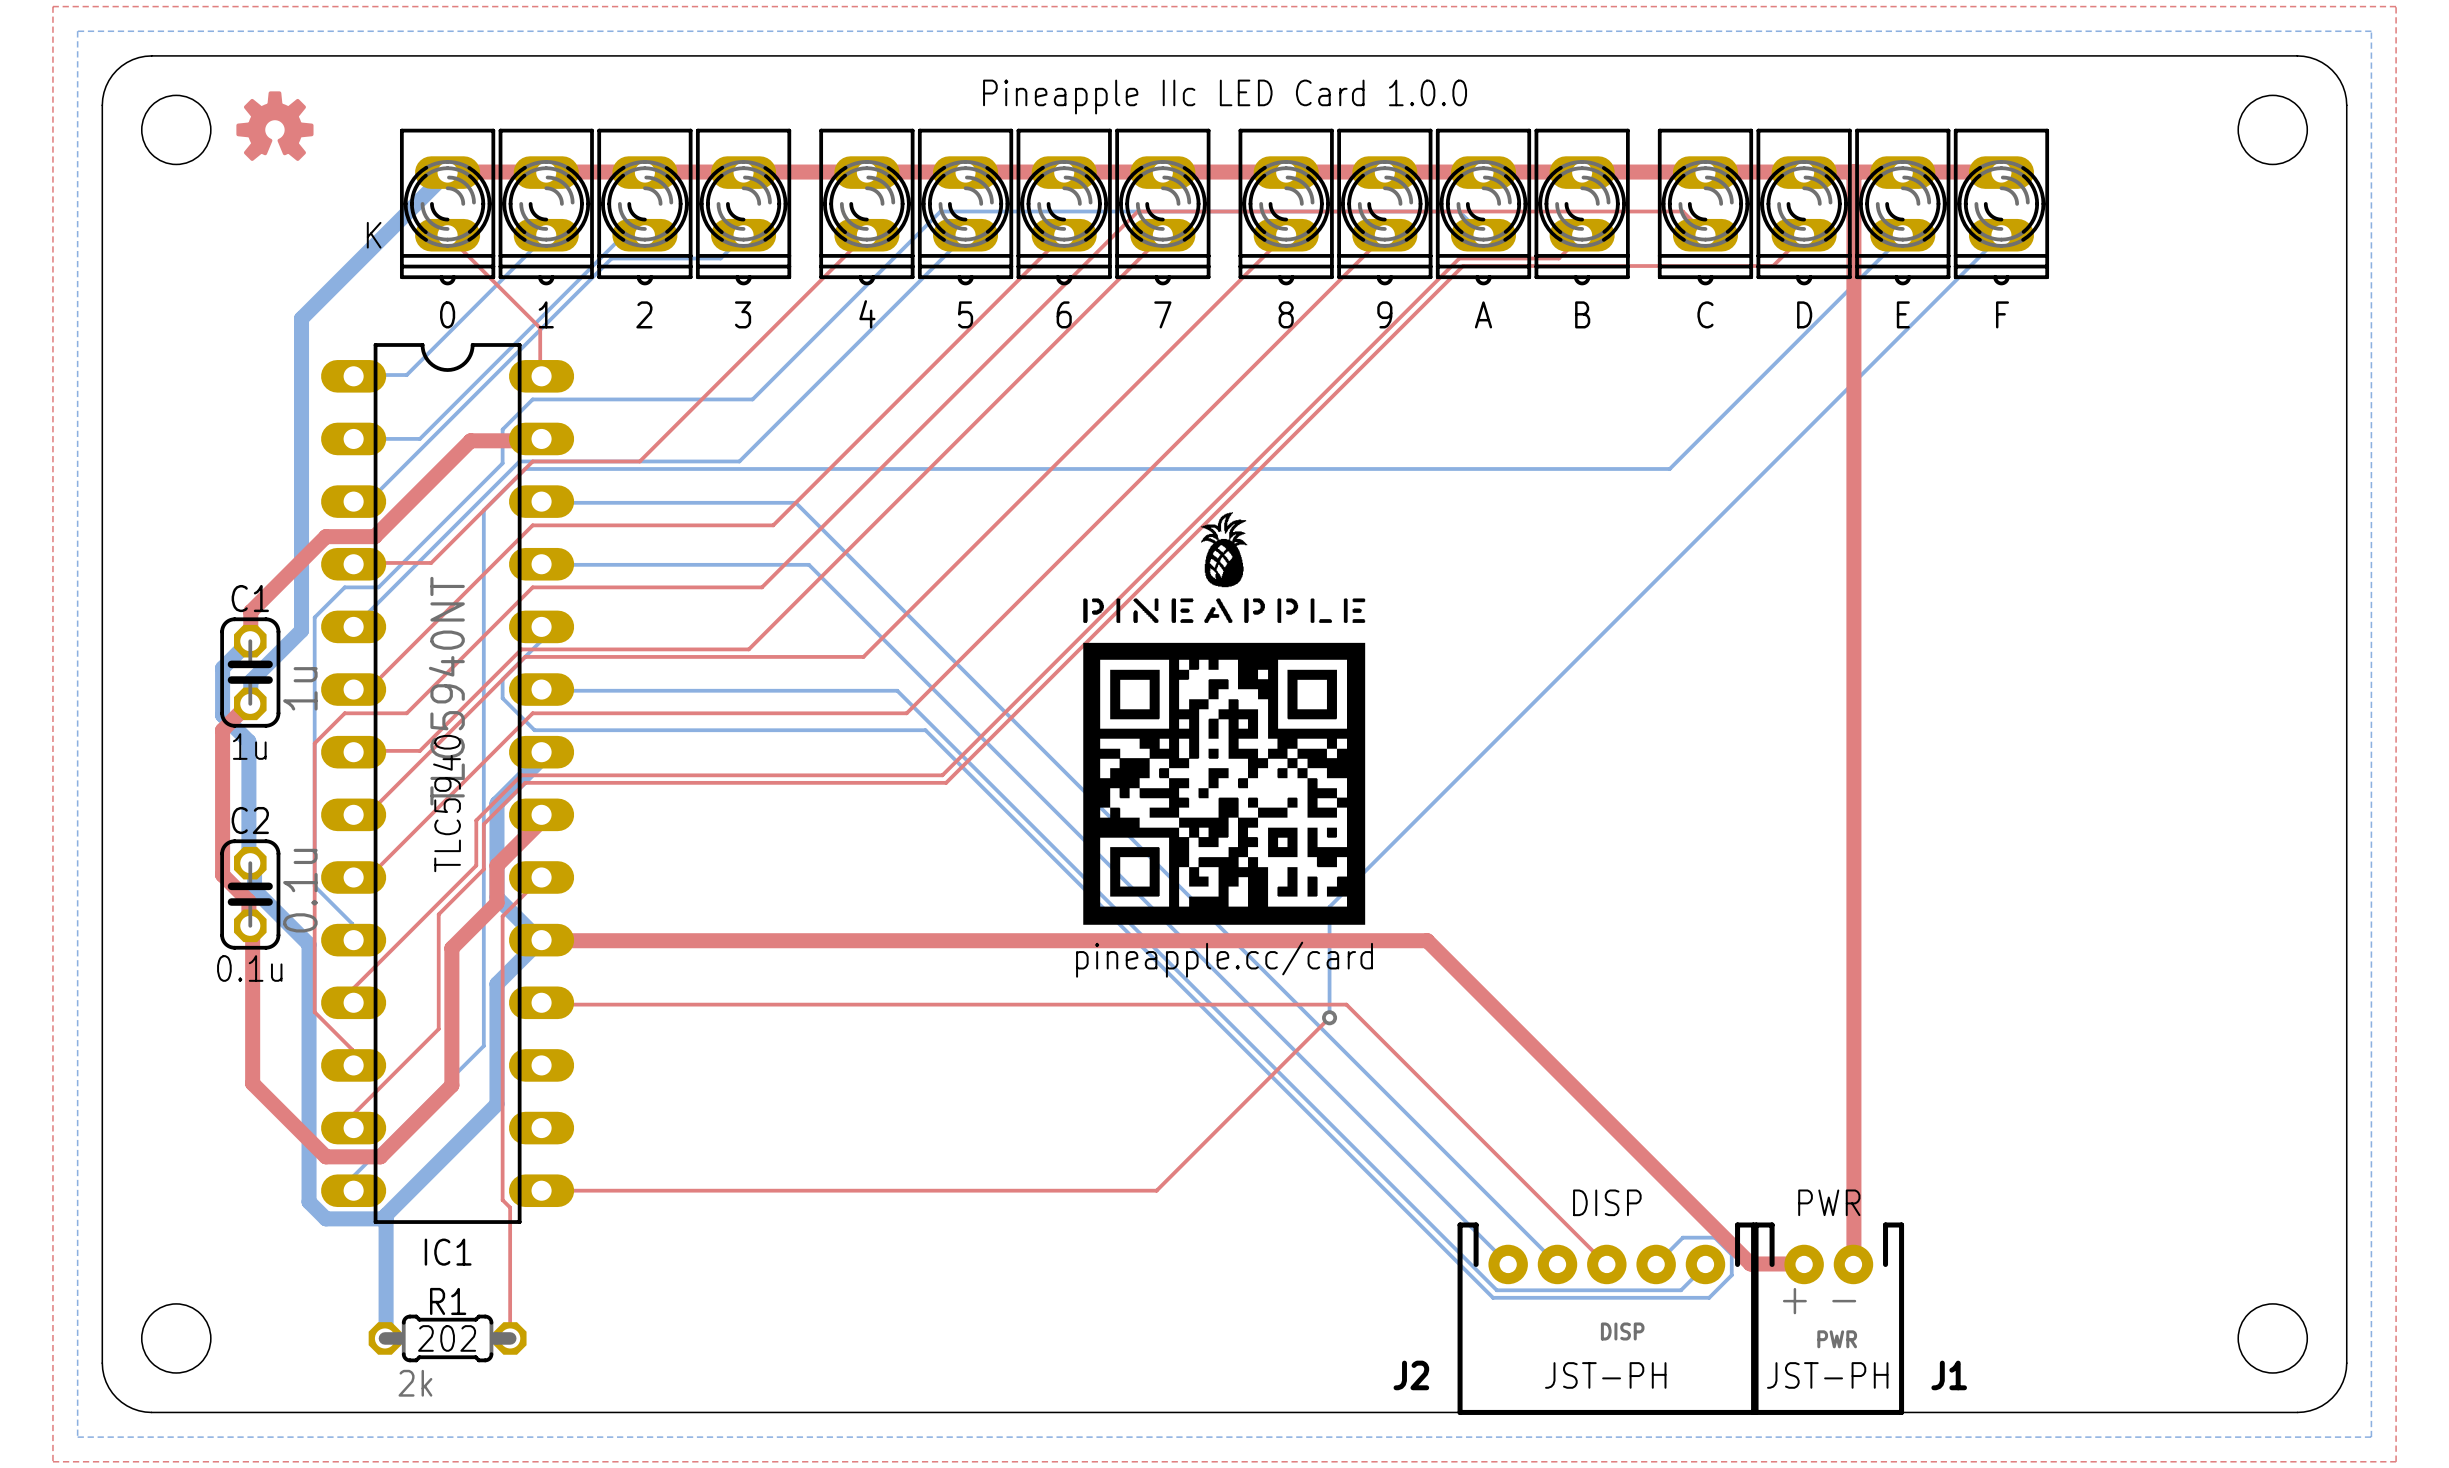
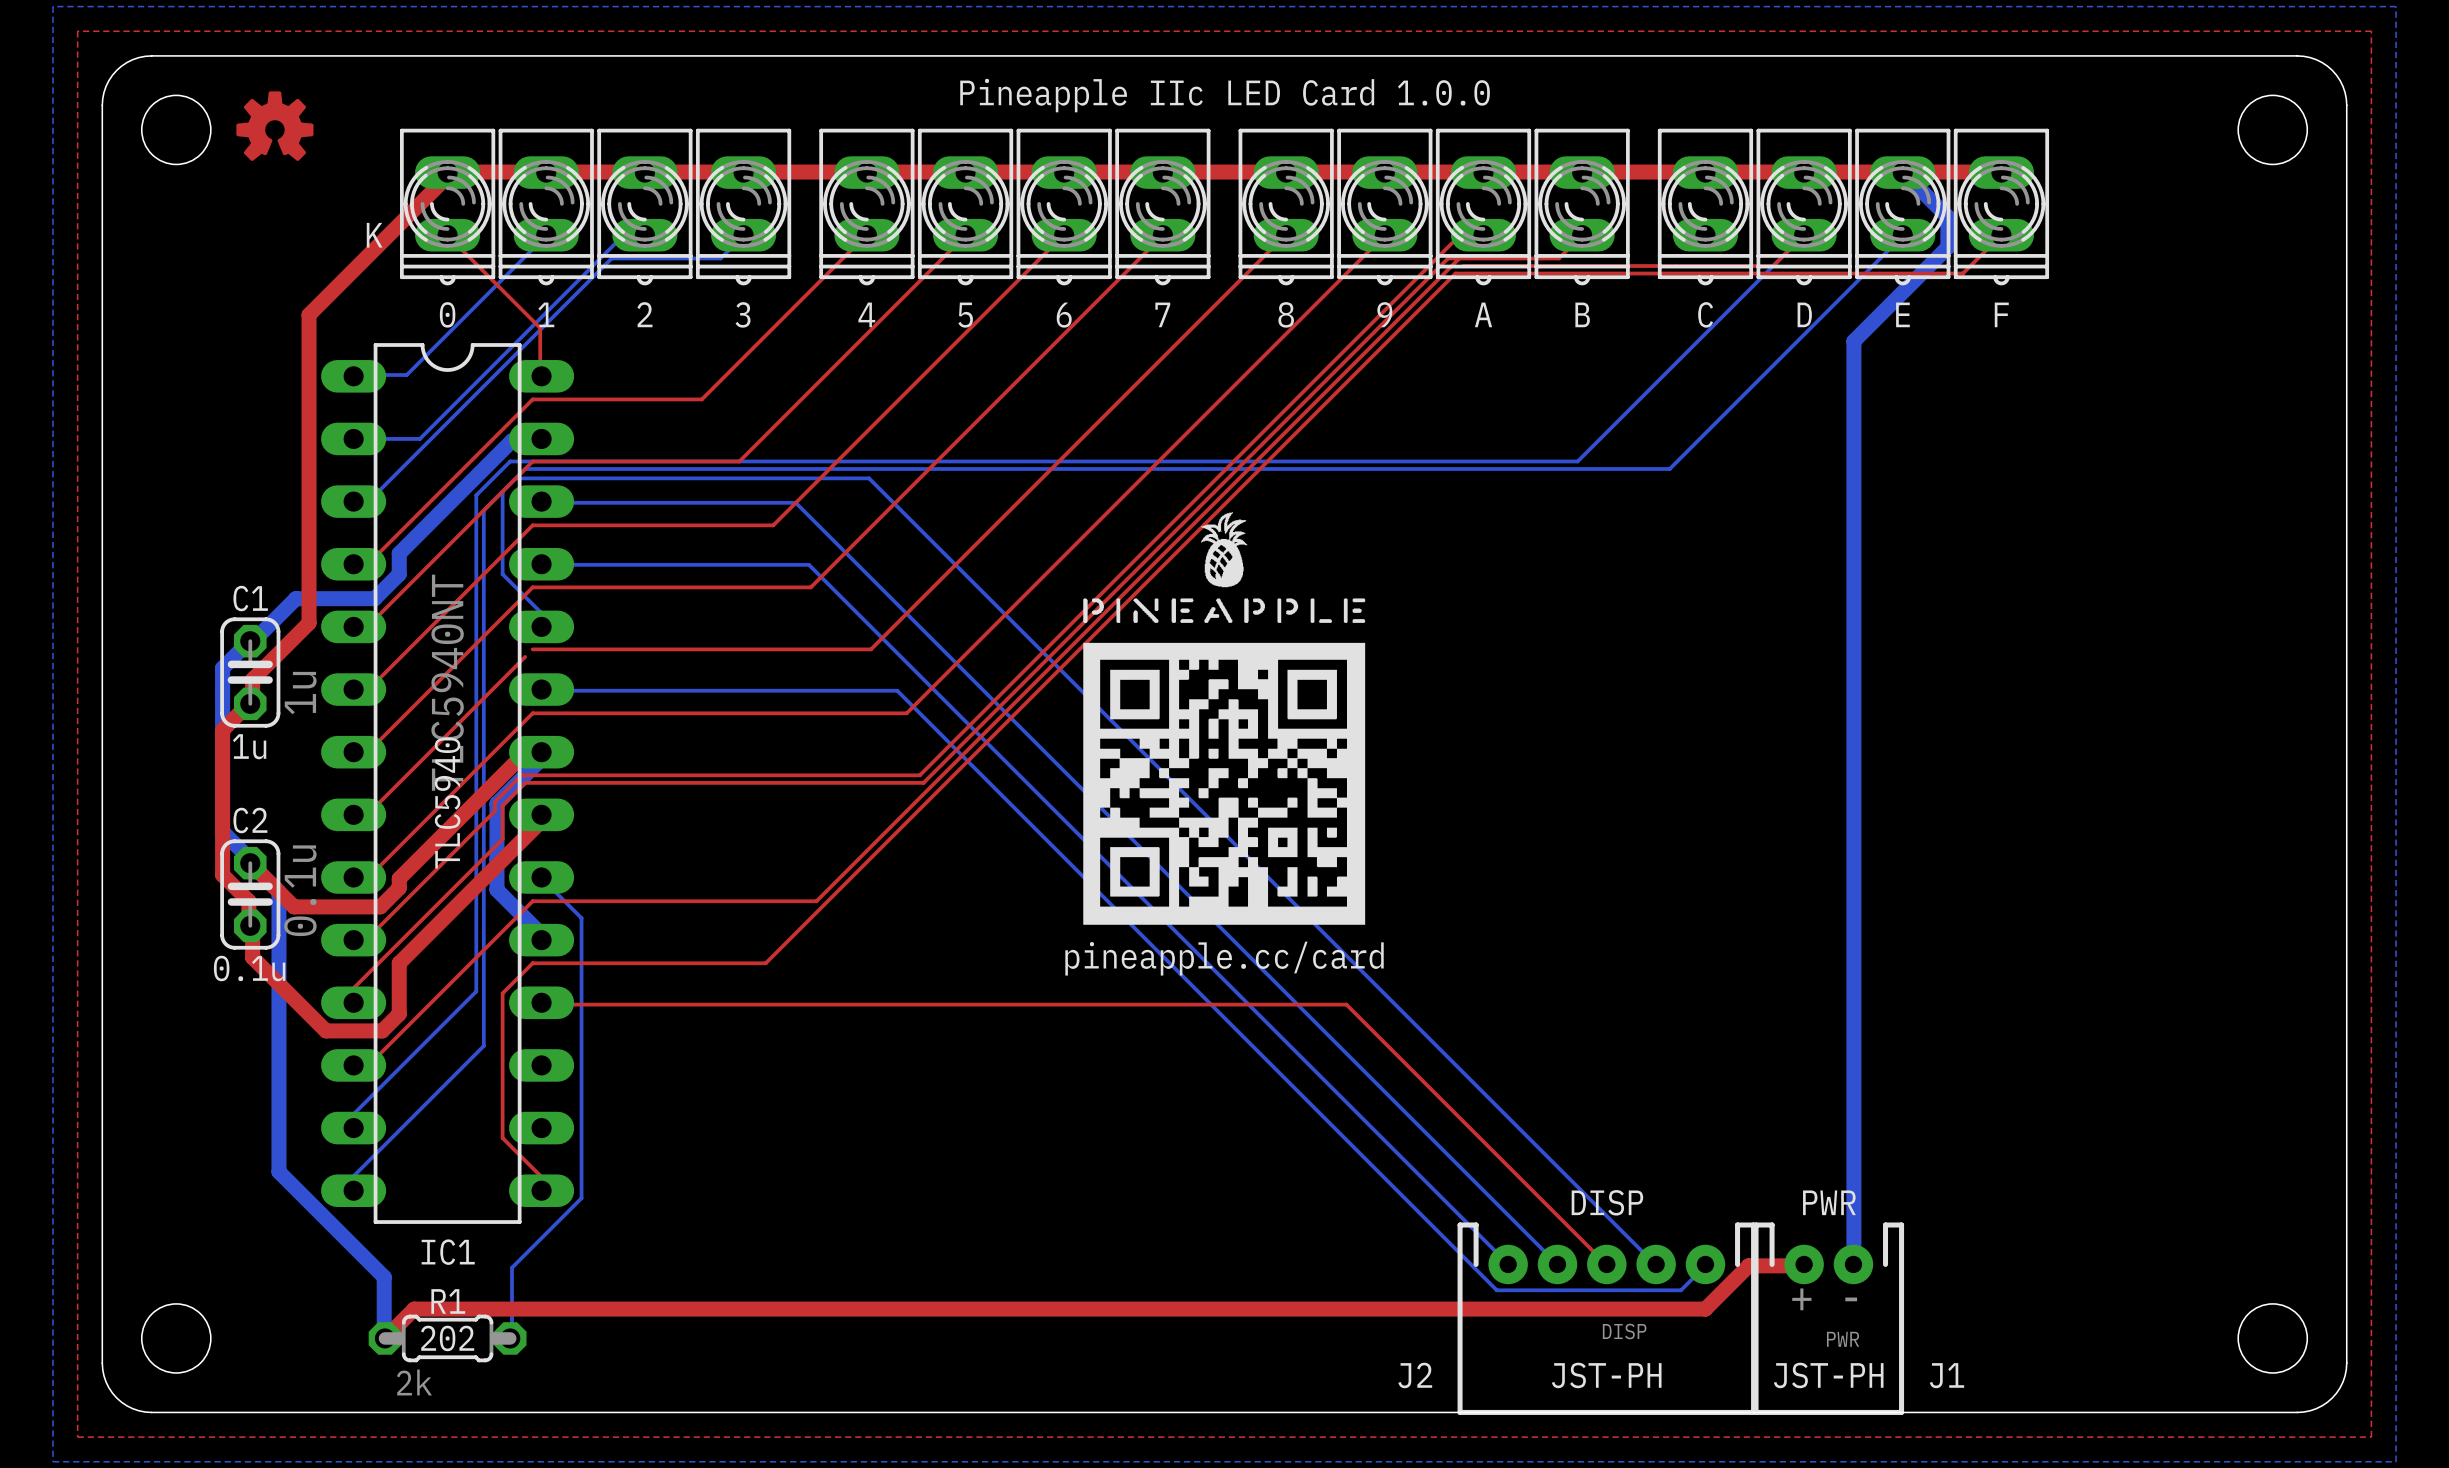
top zone outline: (52, 6) (2396, 6) (2396, 1461) (52, 1461) (52, 6) -> (77, 31) (77, 1437) (2371, 1437) (2371, 31) (77, 31)
bottom zone outline: (77, 31) (2371, 31) (2371, 1437) (77, 1437) (77, 31) -> (52, 6) (52, 1461) (2396, 1461) (2396, 6) (52, 6)
bottom track: (447, 172) (301, 318) (301, 630) (250, 681) (250, 703) -> none
top track: none -> (447, 172) (444, 179) (309, 314) (309, 623) (252, 679) (252, 696) (250, 703)
top track: (1853, 172) (1853, 1264) -> none
bottom track: none -> (1902, 172) (1947, 217) (1947, 247) (1853, 341) (1853, 1264)
bottom track: (965, 235) (739, 461) -> (1804, 235) (1577, 461) (739, 461)
top track: none -> (965, 235) (739, 461) (639, 461)
bottom track: (1483, 235) (1459, 211) (940, 211) (752, 399) (532, 399) (502, 429) (502, 463) (378, 587) (344, 587) (314, 617) (314, 886) (352, 923) (353, 940) -> none
top track: (1705, 235) (1682, 211) (1137, 211) (761, 587) -> none
bottom track: (2001, 235) (1329, 906) (1329, 1017) -> none
top track: (1462, 266) (1455, 273) -> (2001, 235) (1962, 273) (1455, 273)
top track: (701, 399) (639, 461) -> (701, 399) (532, 399) (369, 562)
bottom track: none -> (541, 438) (540, 440) (512, 440) (399, 553) (399, 574) (374, 598) (295, 598) (256, 638) (250, 641)
top track: (541, 438) (540, 440) (470, 440) (374, 536) (325, 536) (250, 611) (250, 641) -> none
bottom track: (519, 461) (353, 626) -> (519, 461) (510, 461) (476, 495) (476, 991) (354, 1113) (353, 1128)
bottom track: none -> (502, 491) (502, 574) (540, 611) (541, 626)
top track: (369, 562) (431, 562) -> (353, 626) (367, 626) (431, 562)
top track: (810, 587) (748, 649) -> (810, 587) (761, 587)
bottom track: (541, 626) (540, 641) (502, 679) (502, 698) (534, 730) (925, 730) (1493, 1297) (1709, 1297) (1731, 1275) (1731, 1254) (1714, 1237) (1682, 1237) (1656, 1264) -> (515, 478) (869, 478) (1656, 1264)
top track: (532, 649) (521, 649) (419, 750) (369, 750) -> (406, 713) (369, 750)
top track: (870, 649) (863, 656) (525, 656) -> (870, 649) (748, 649)
top track: (406, 713) (344, 713) (314, 743) (314, 1012) (352, 1049) (353, 1065) -> (942, 775) (816, 901) (532, 901) (369, 1064) (353, 1065)
bottom track: (222, 715) (248, 741) (248, 861) (254, 869) (254, 889) (309, 944) (309, 1201) -> (222, 715) (222, 831) (278, 891) (278, 1171) (309, 1201)
top track: none -> (541, 752) (525, 752) (399, 878) (399, 888) (380, 906) (294, 906) (250, 863)
top track: (919, 775) (942, 775) -> (919, 775) (1459, 235) (1483, 235)
top track: (923, 782) (946, 782) -> (923, 782) (1447, 258) (1459, 258)
top track: (495, 801) (476, 820) (476, 865) -> (502, 805) (502, 839) (476, 865)
top track: none -> (495, 801) (495, 811) (367, 938) (353, 940)
top track: (502, 805) (483, 824) (483, 869) (438, 914) (438, 1029) (354, 1113) (353, 1128) -> none
top track: (496, 865) (496, 903) (451, 948) (451, 1085) (380, 1156) (325, 1156) (252, 1083) (252, 957) -> (496, 865) (399, 963) (399, 1014) (382, 1030) (325, 1030) (252, 957)
bottom track: none -> (541, 877) (581, 918) (581, 1198) (512, 1267) (512, 1337) (510, 1338)
top track: (541, 877) (502, 916) (502, 993) -> (946, 782) (765, 963) (532, 963) (502, 993)
bottom track: (496, 889) (496, 897) (541, 940) (496, 983) (496, 1104) (386, 1215) (384, 1338) -> (496, 889) (540, 933) (541, 940)
top track: (541, 940) (1427, 940) (1750, 1263) (1804, 1264) -> (384, 1338) (414, 1309) (1705, 1309) (1748, 1265) (1804, 1264)
top track: (1329, 1017) (1156, 1190) (541, 1190) -> none
via: (1329, 1017) -> none
top track: (502, 1138) (502, 1200) (510, 1207) (510, 1338) -> (502, 1138) (540, 1175) (541, 1190)
bottom track: (325, 1218) (386, 1218) -> (325, 1218) (384, 1277) (384, 1338)

